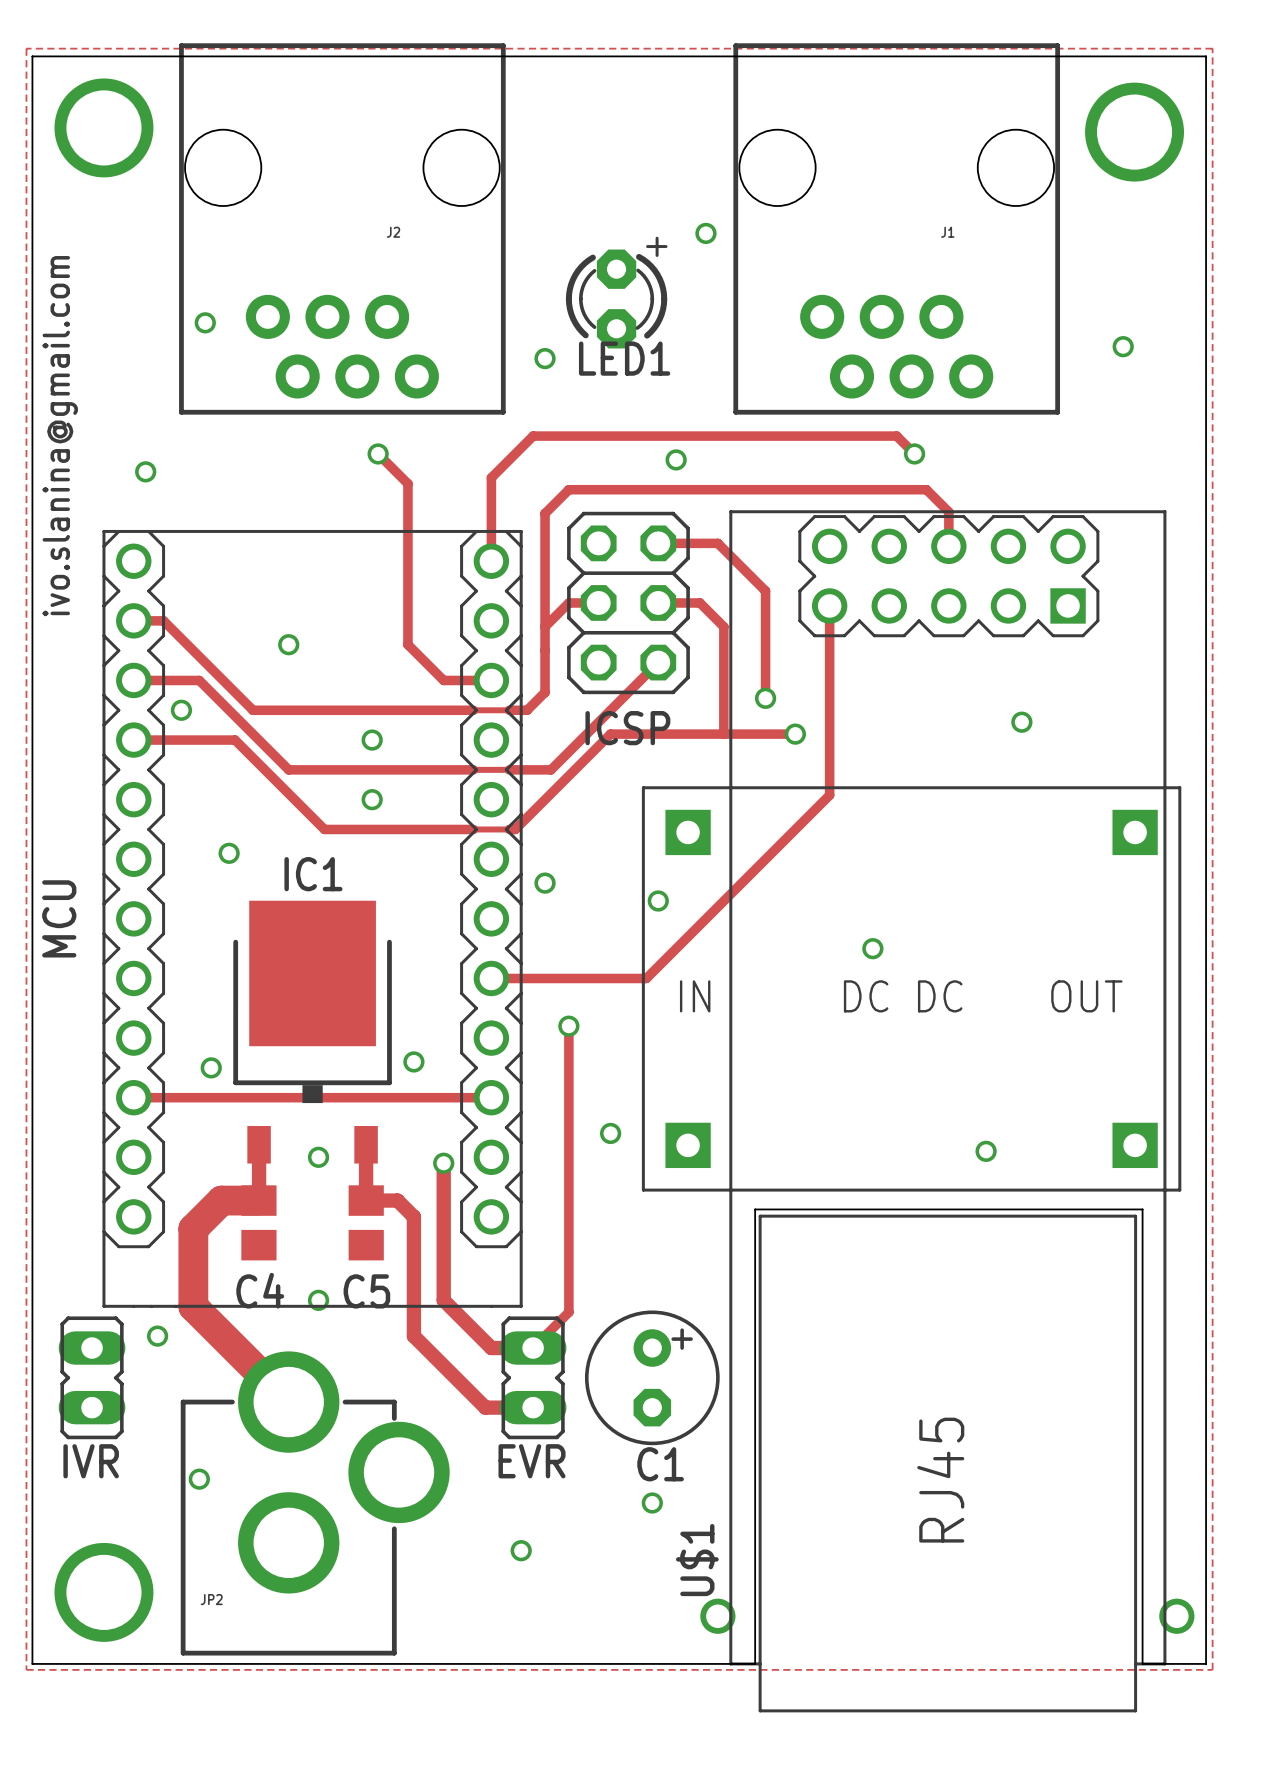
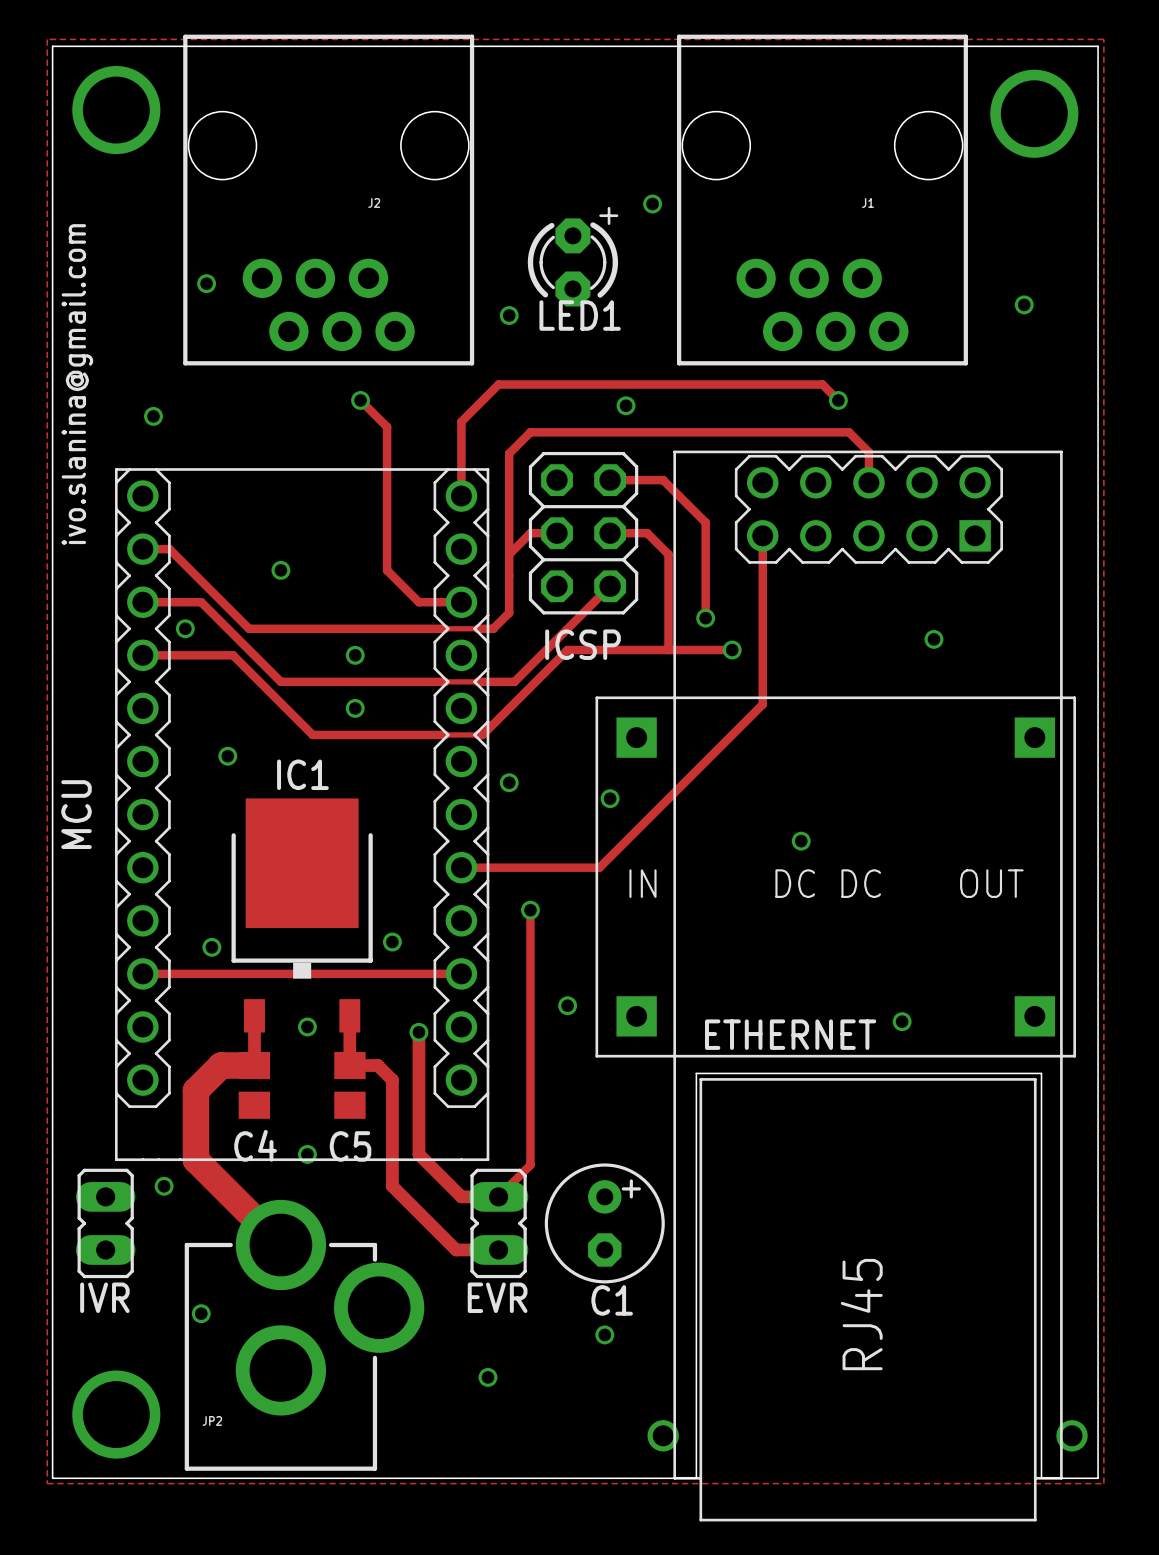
U$1 name: U$1 (697, 1560) -> ETHERNET (790, 1034)

